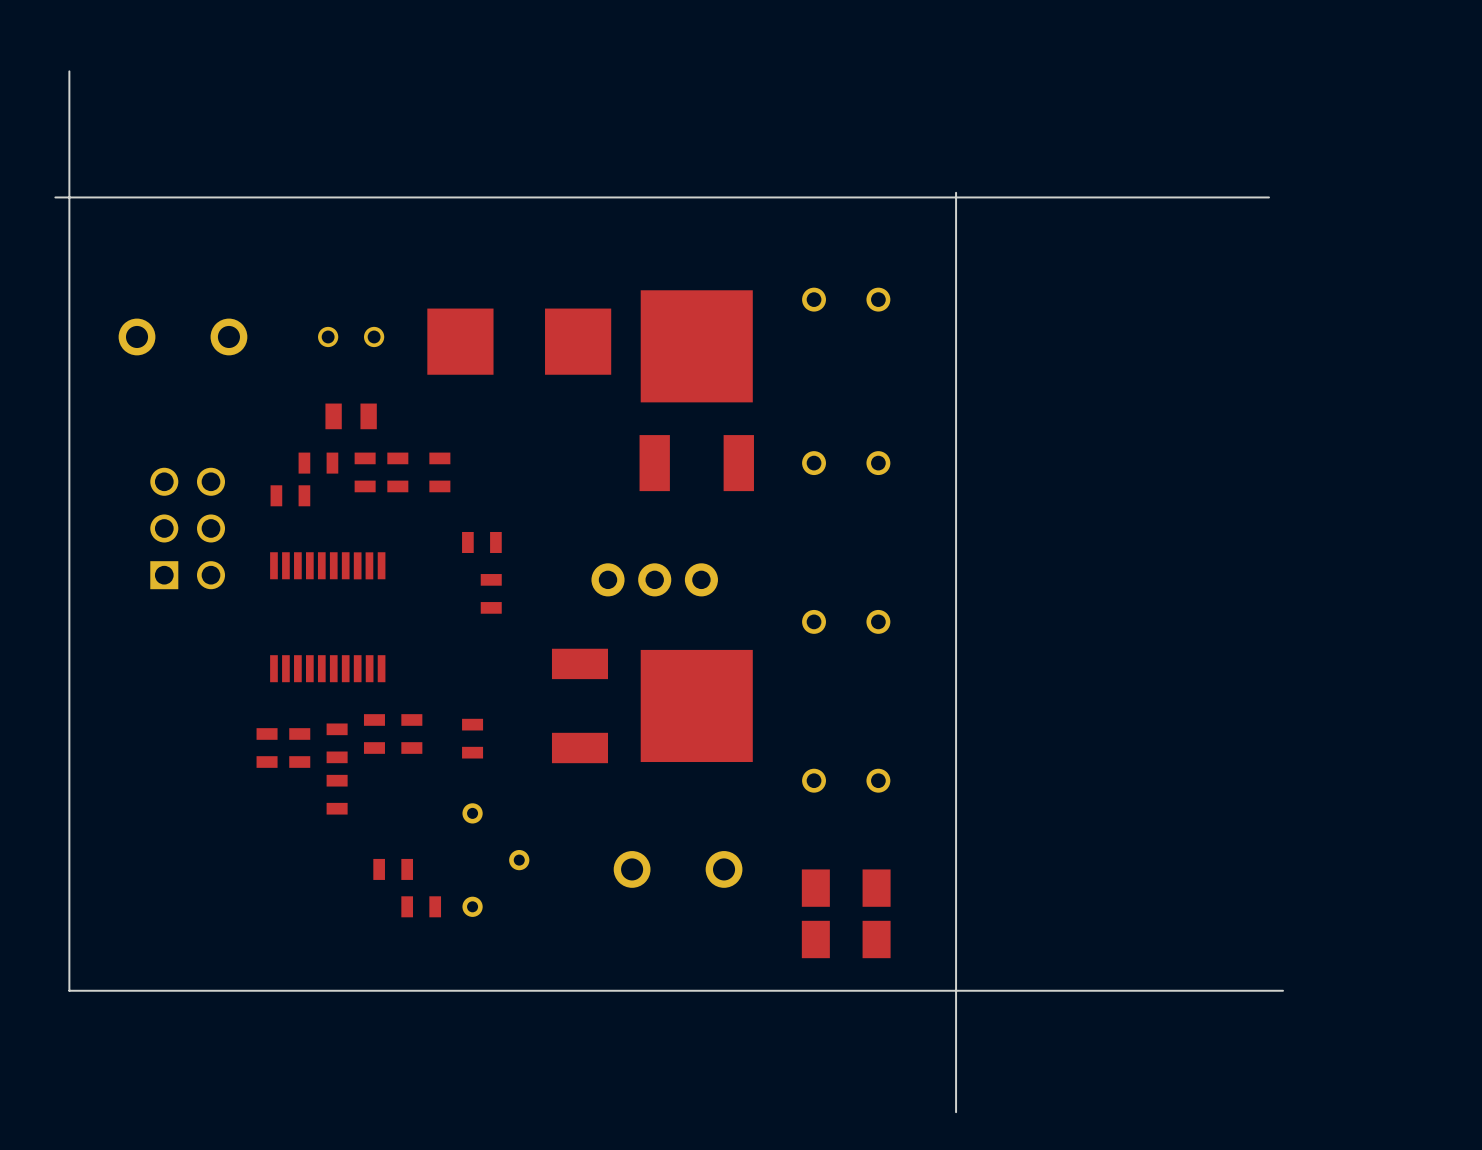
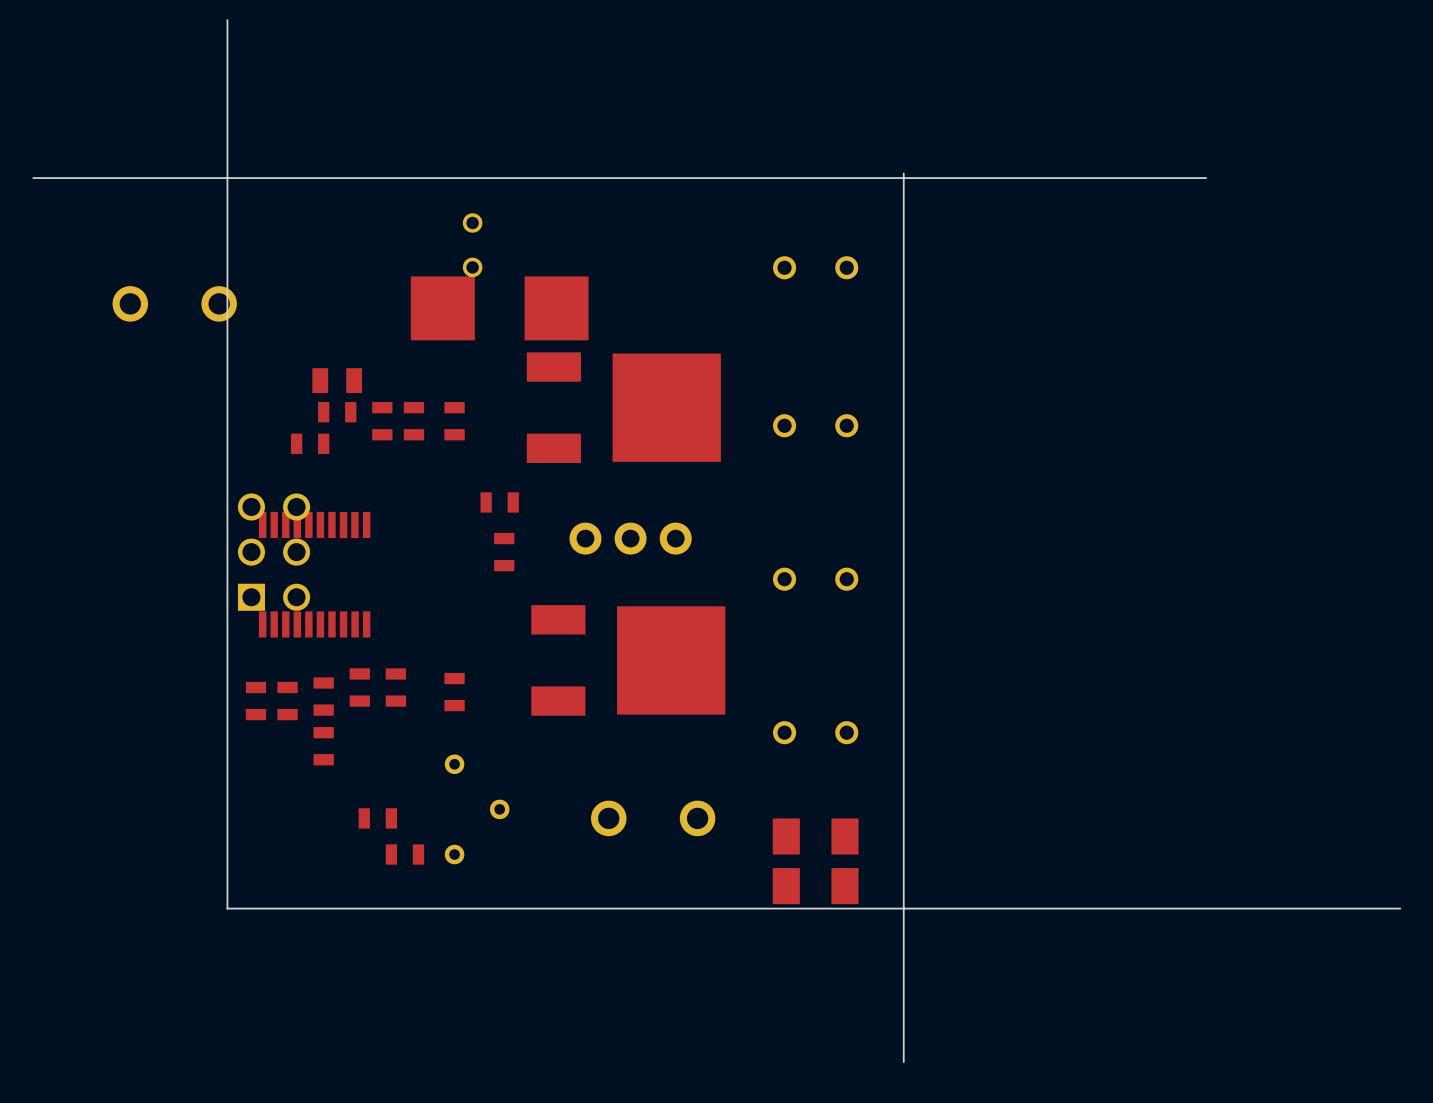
board edge: (69, 71) (69, 990) (1283, 990) -> (227, 20) (227, 908) (1400, 908)
board edge: (956, 192) (956, 1112) -> (903, 173) (903, 1062)
board edge: (1269, 197) (55, 197) -> (1206, 178) (33, 178)
part rotation: 0° (351, 336) -> 90° clockwise (472, 245)
part position: (351, 336) -> (472, 245)
part rotation: 0° (696, 390) -> 90° clockwise (623, 407)
part: none -> (337, 412)
part: none -> (454, 421)
part: (318, 463) -> none
part: (365, 472) -> none
part position: (397, 472) -> (382, 421)
part position: (439, 472) -> (413, 421)
part: none -> (310, 443)
part: (290, 495) -> none
part position: (187, 528) -> (274, 552)
part: (481, 542) -> none
part: none -> (499, 502)
part: (491, 593) -> none
part: none -> (504, 552)

